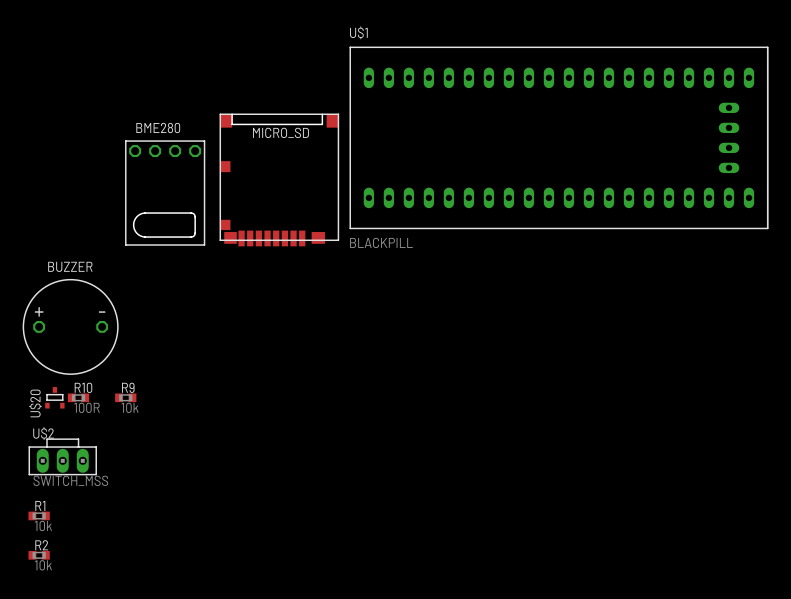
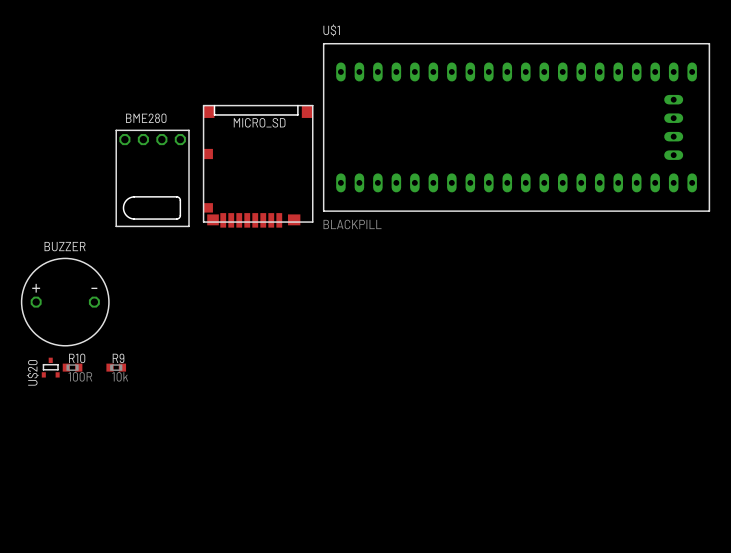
U$2: SWITCH_MSS (62, 456) -> none
R1: 10k (39, 515) -> none
R2: 10k (39, 555) -> none

